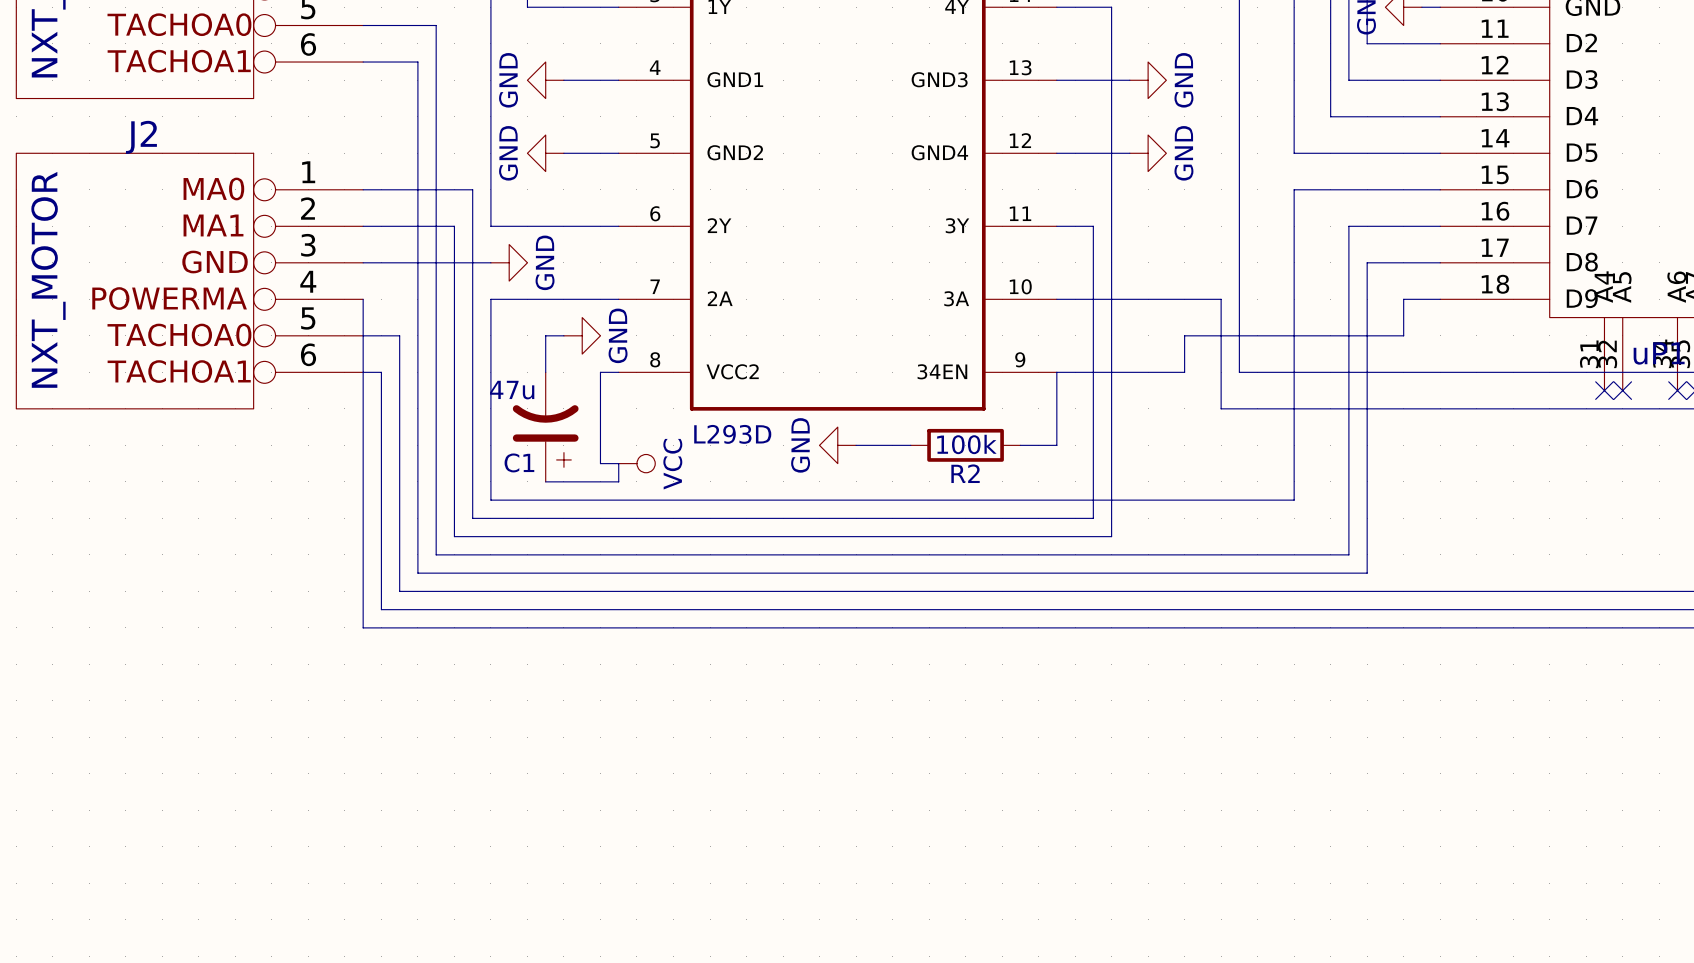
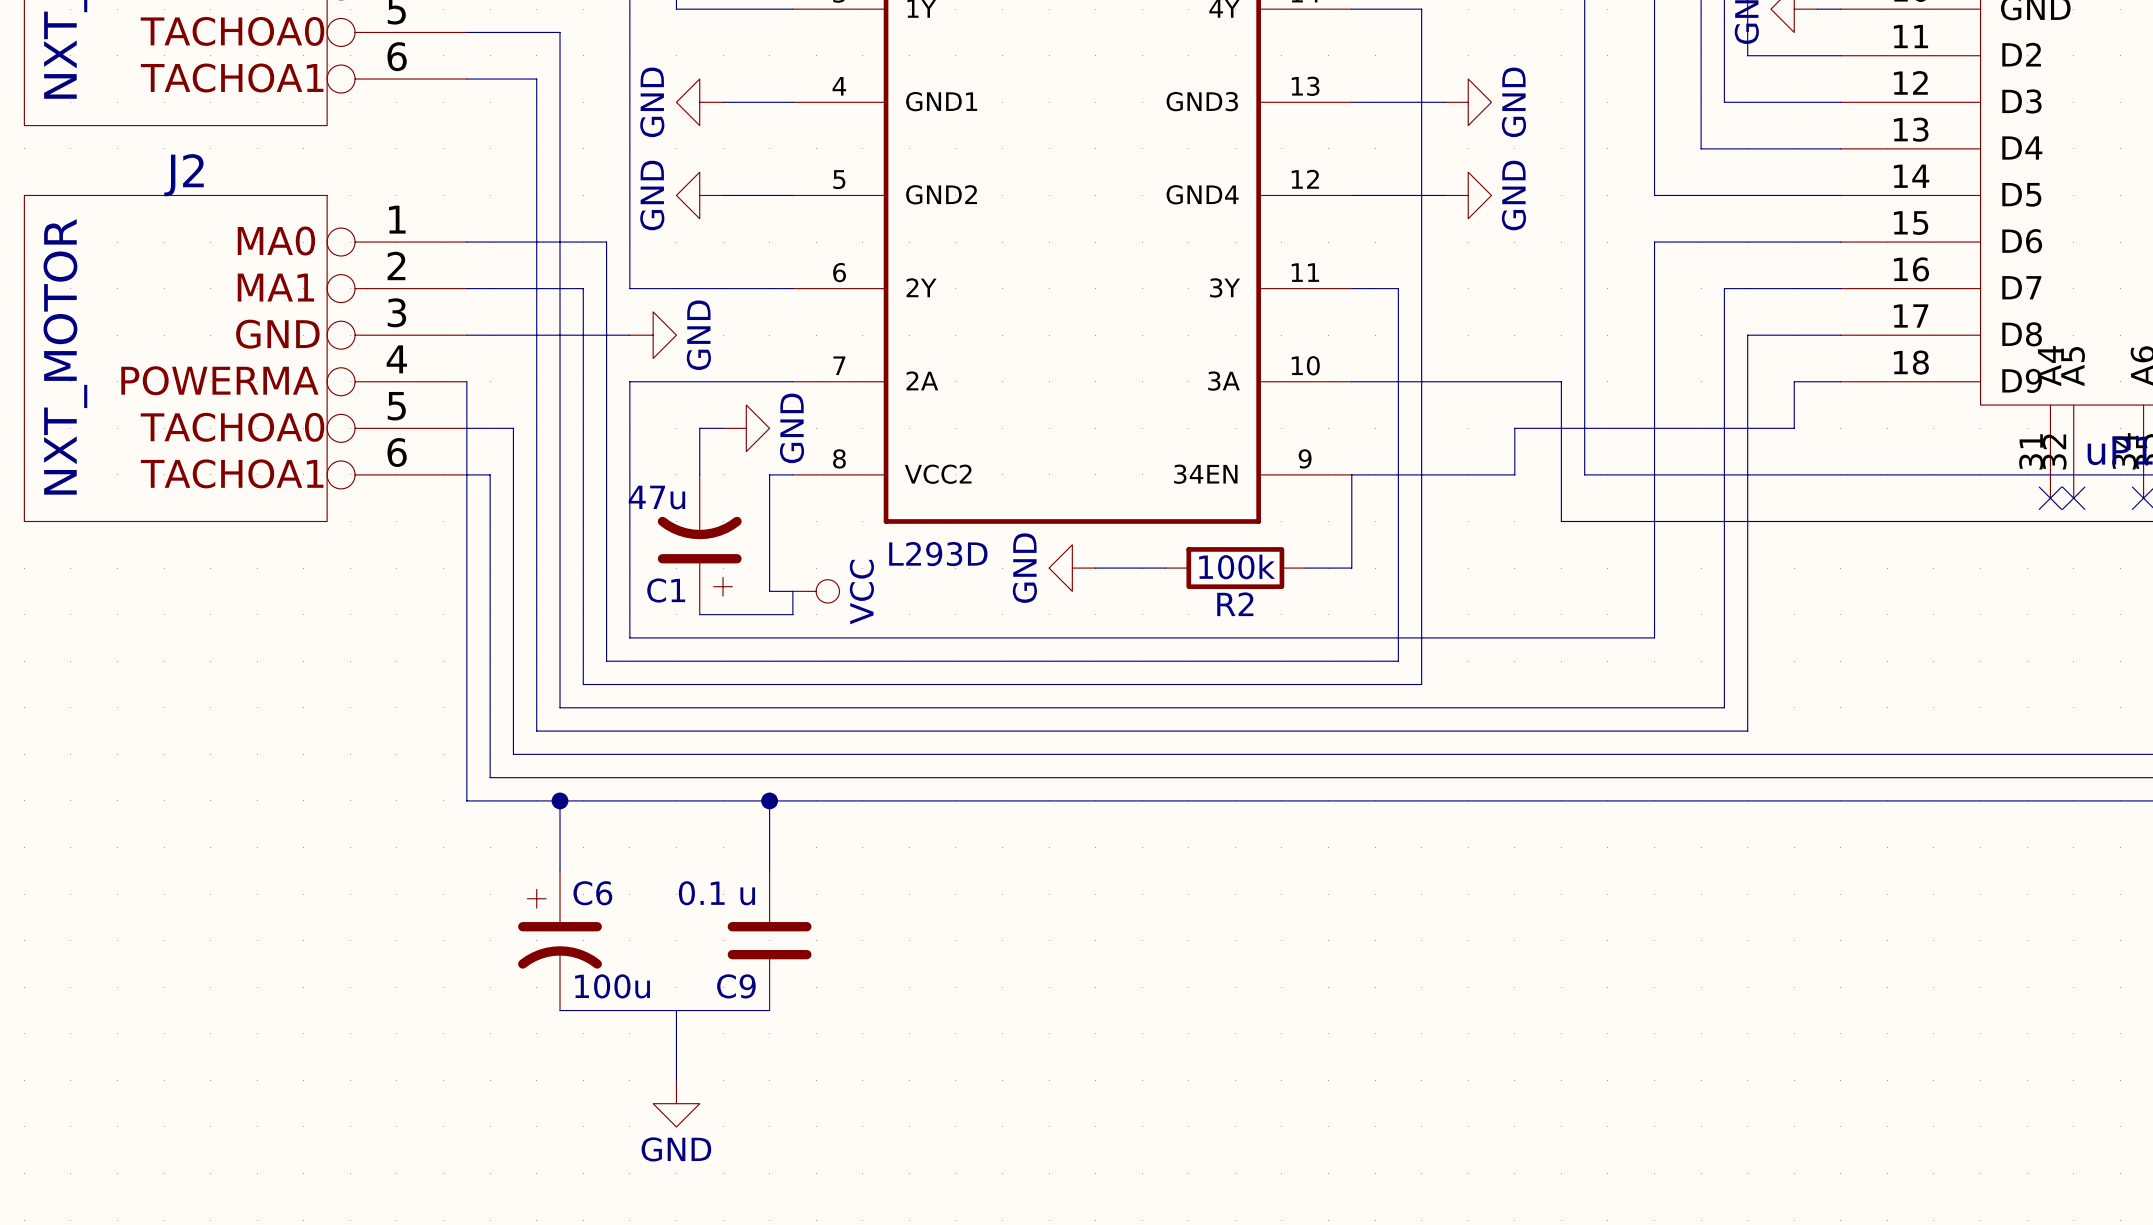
wire: none -> (560, 800) (560, 870)
junction: none -> (560, 800)
wire: none -> (769, 800) (769, 870)
junction: none -> (769, 800)
C6: none -> 100u (560, 940)
C9: none -> 0.1 u (769, 940)
wire: none -> (560, 1010) (769, 1010)
wire: none -> (676, 1010) (676, 1080)
power symbol: none -> GND (676, 1103)

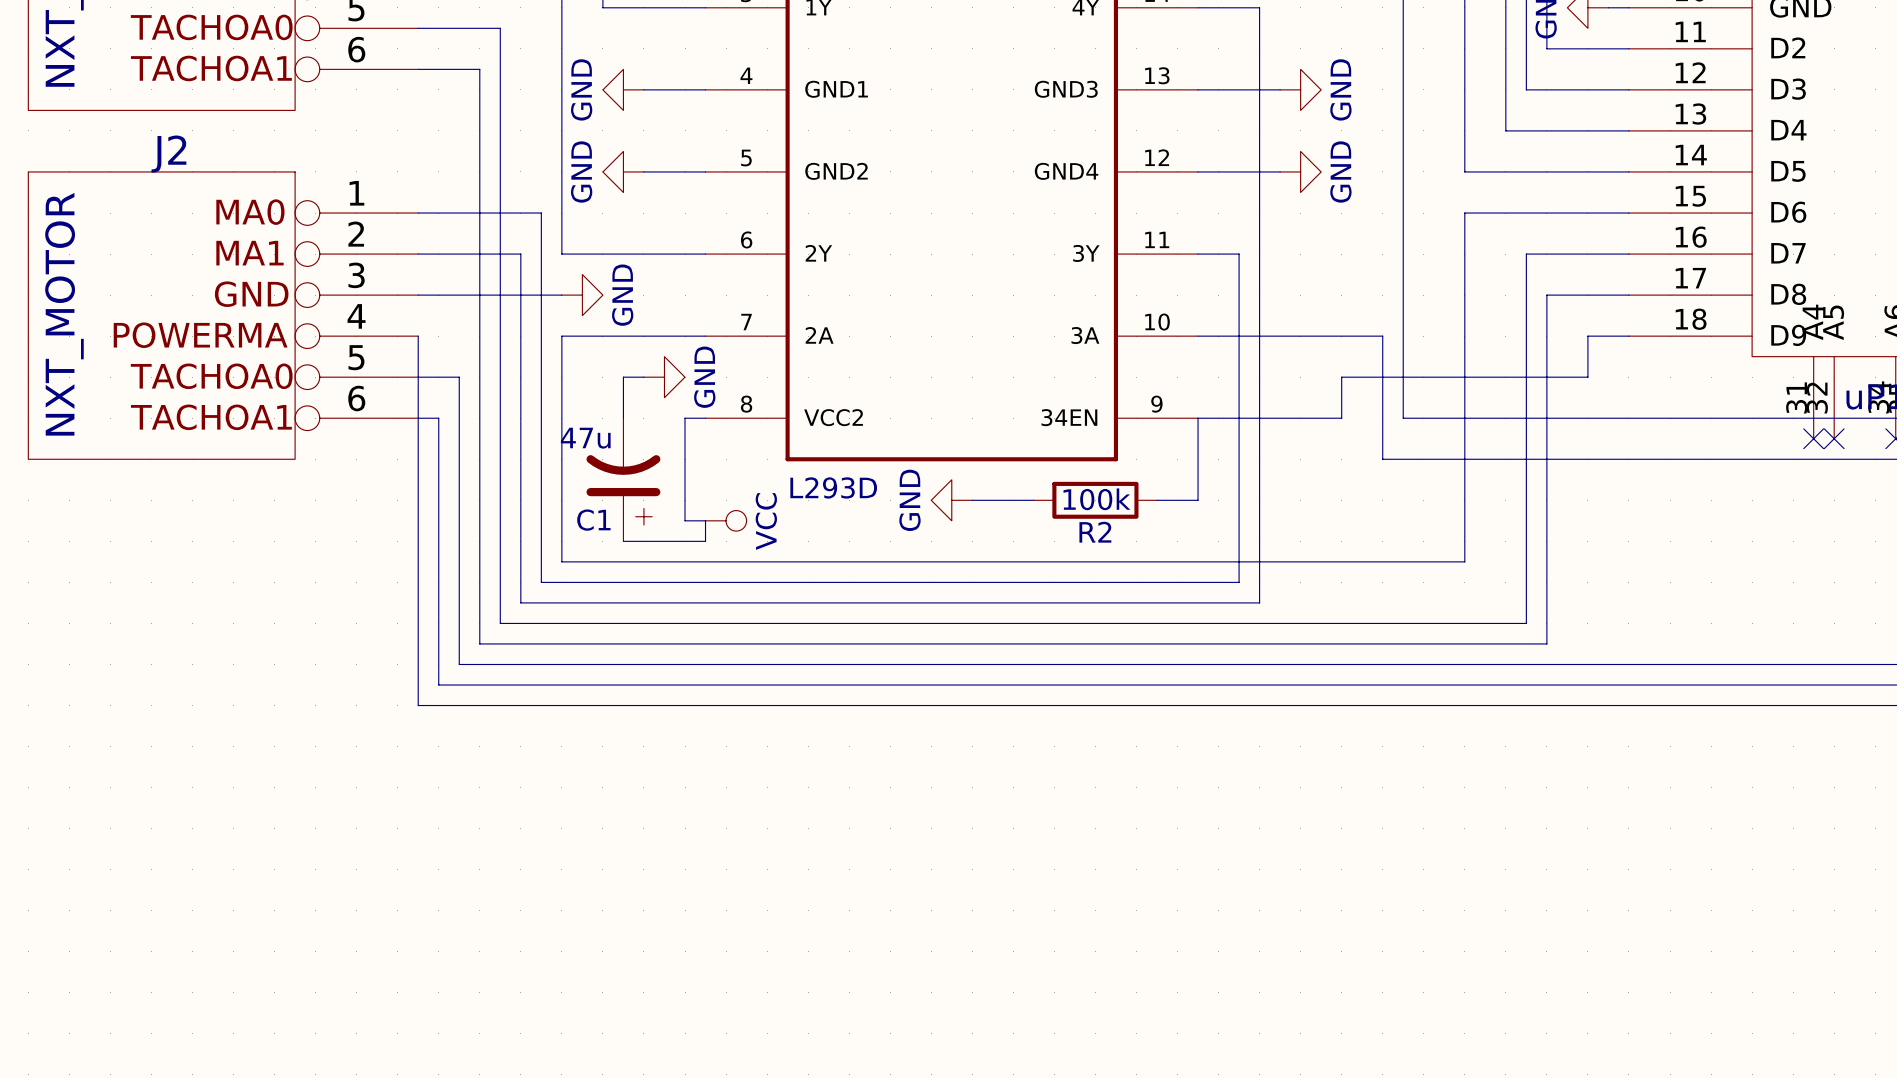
wire: (560, 800) (560, 870) -> none
junction: (560, 800) -> none
wire: (769, 800) (769, 870) -> none
junction: (769, 800) -> none
C6: 100u (560, 940) -> none
C9: 0.1 u (769, 940) -> none
wire: (560, 1010) (769, 1010) -> none
wire: (676, 1010) (676, 1080) -> none
power symbol: GND (676, 1103) -> none

